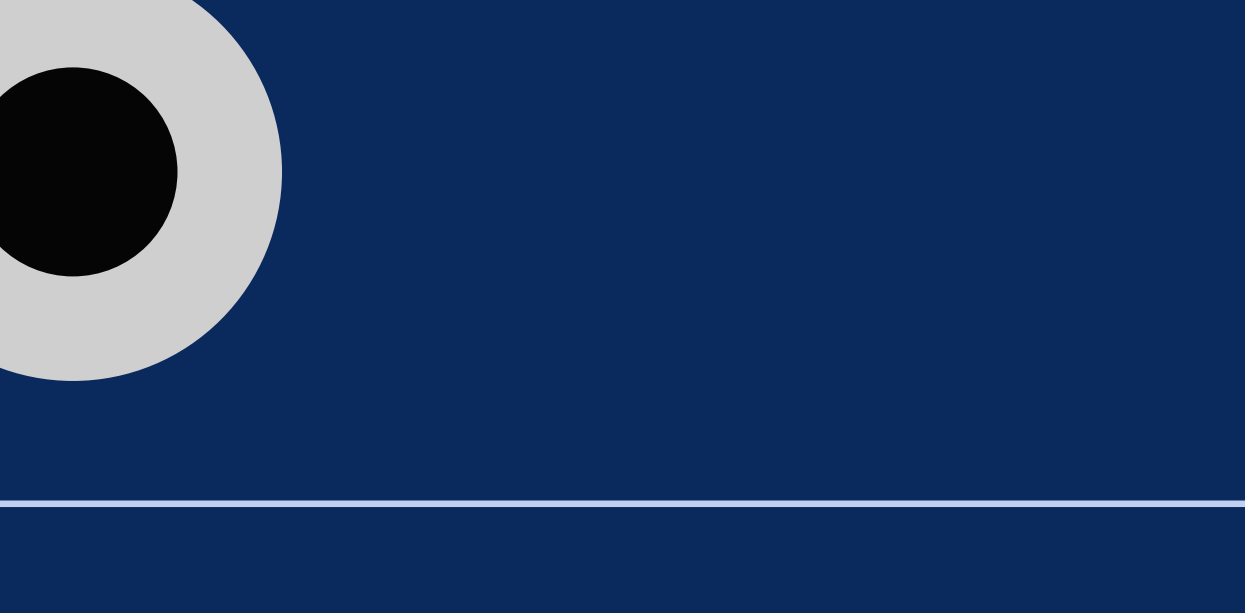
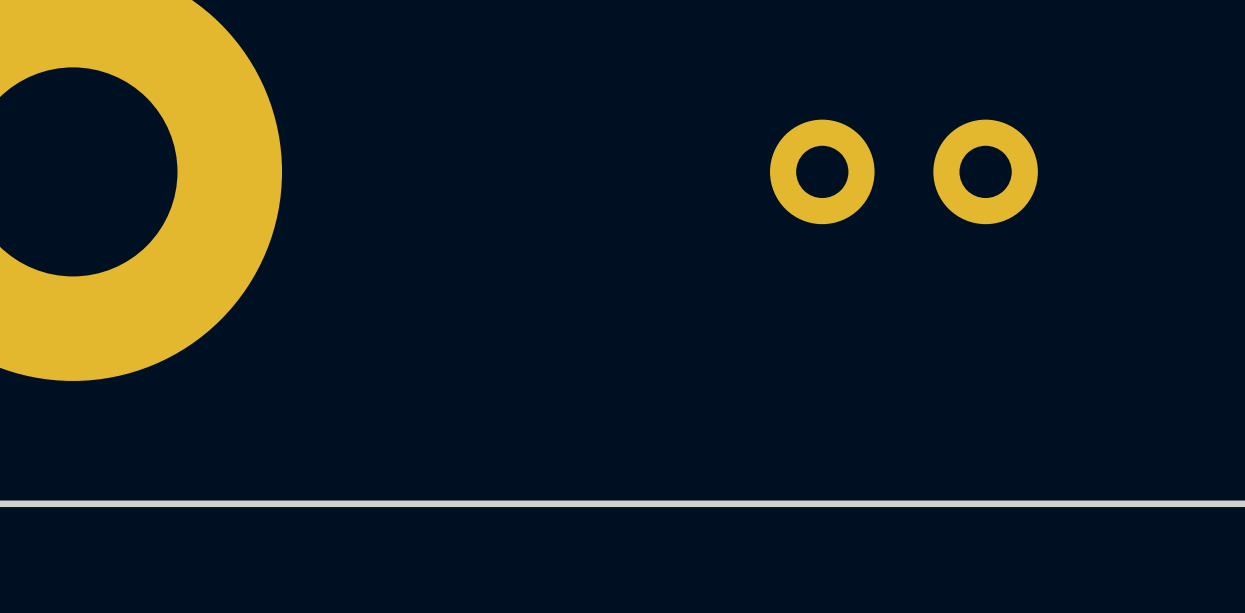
part: none -> (903, 171)

